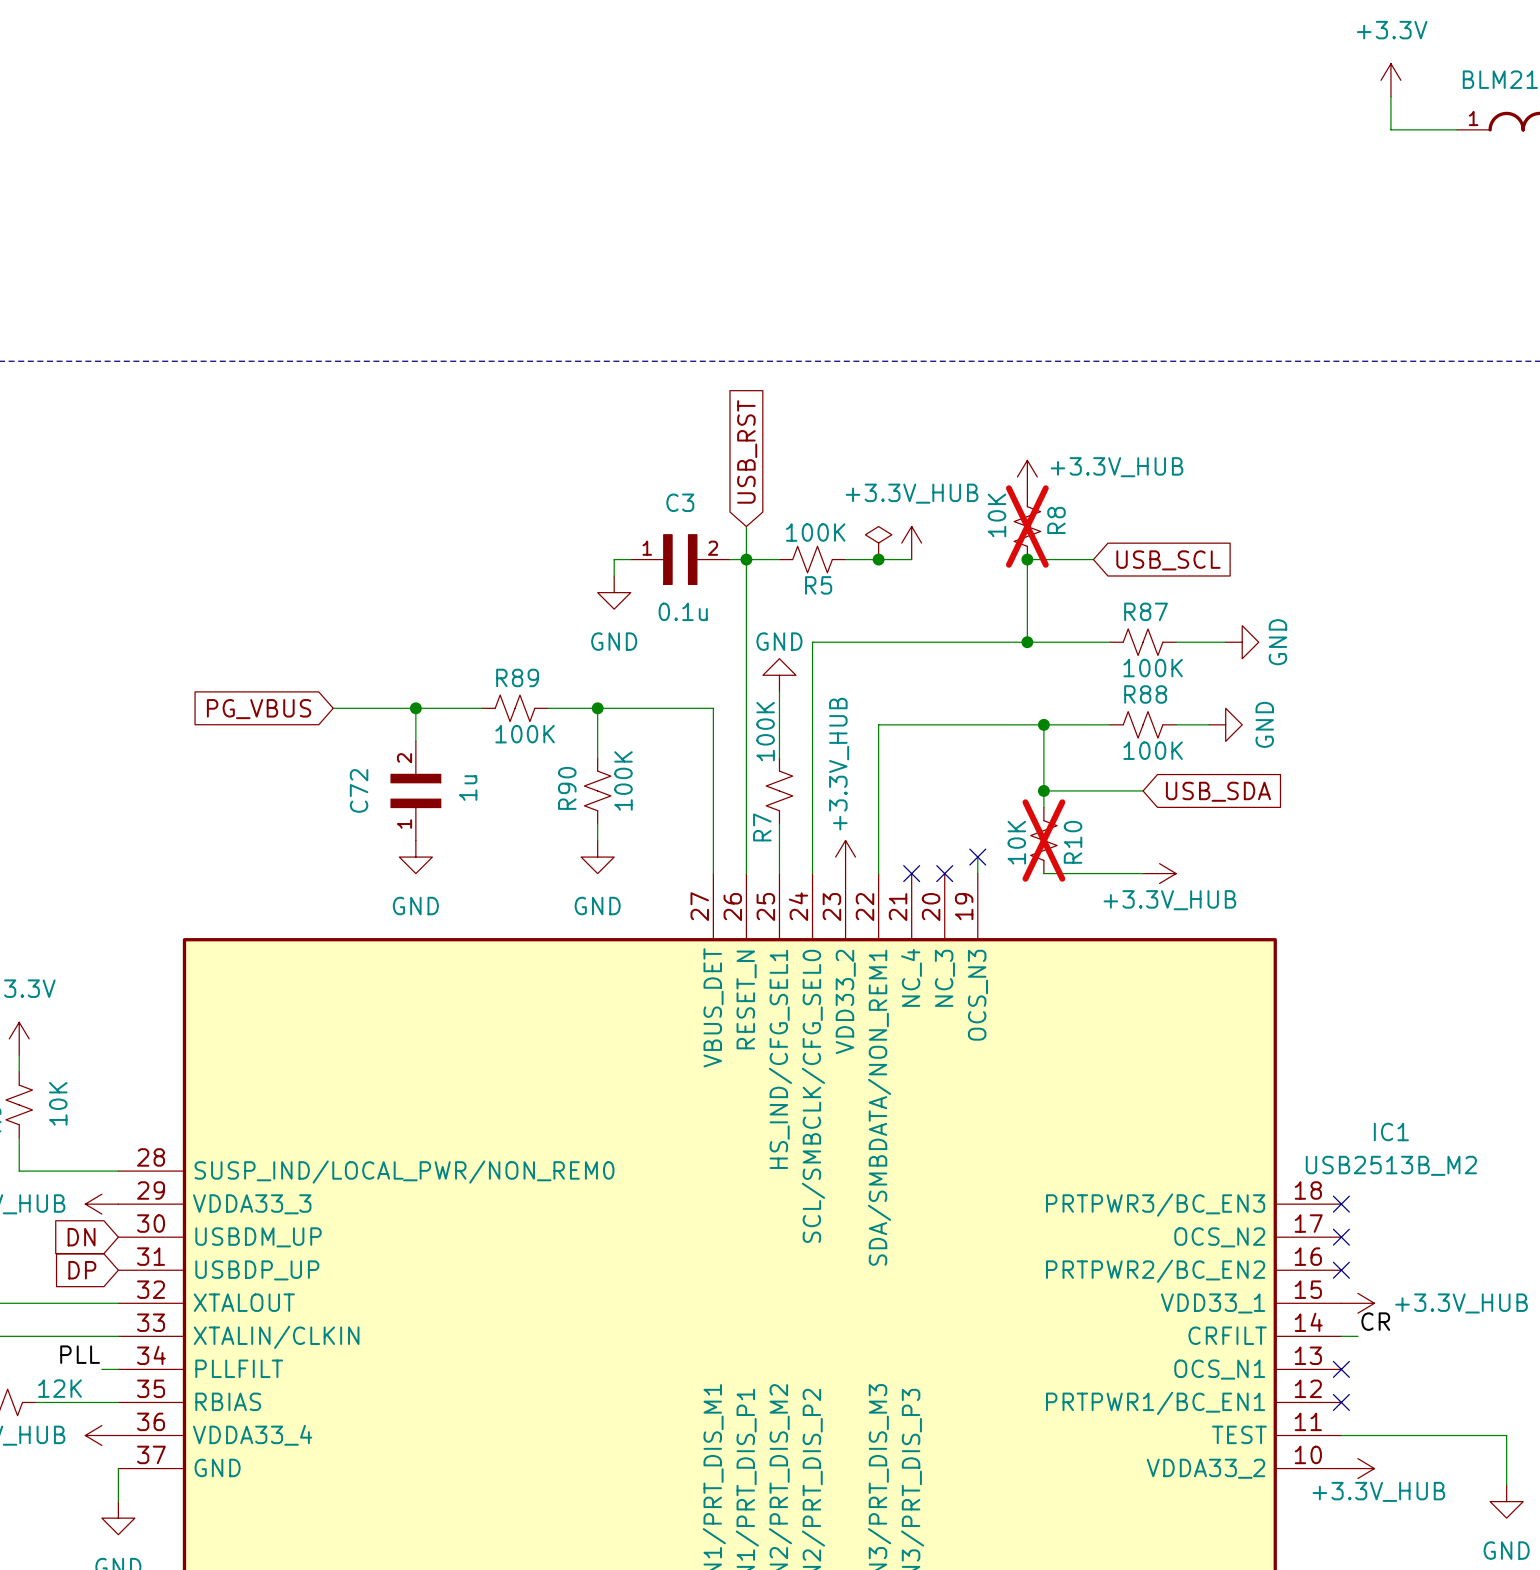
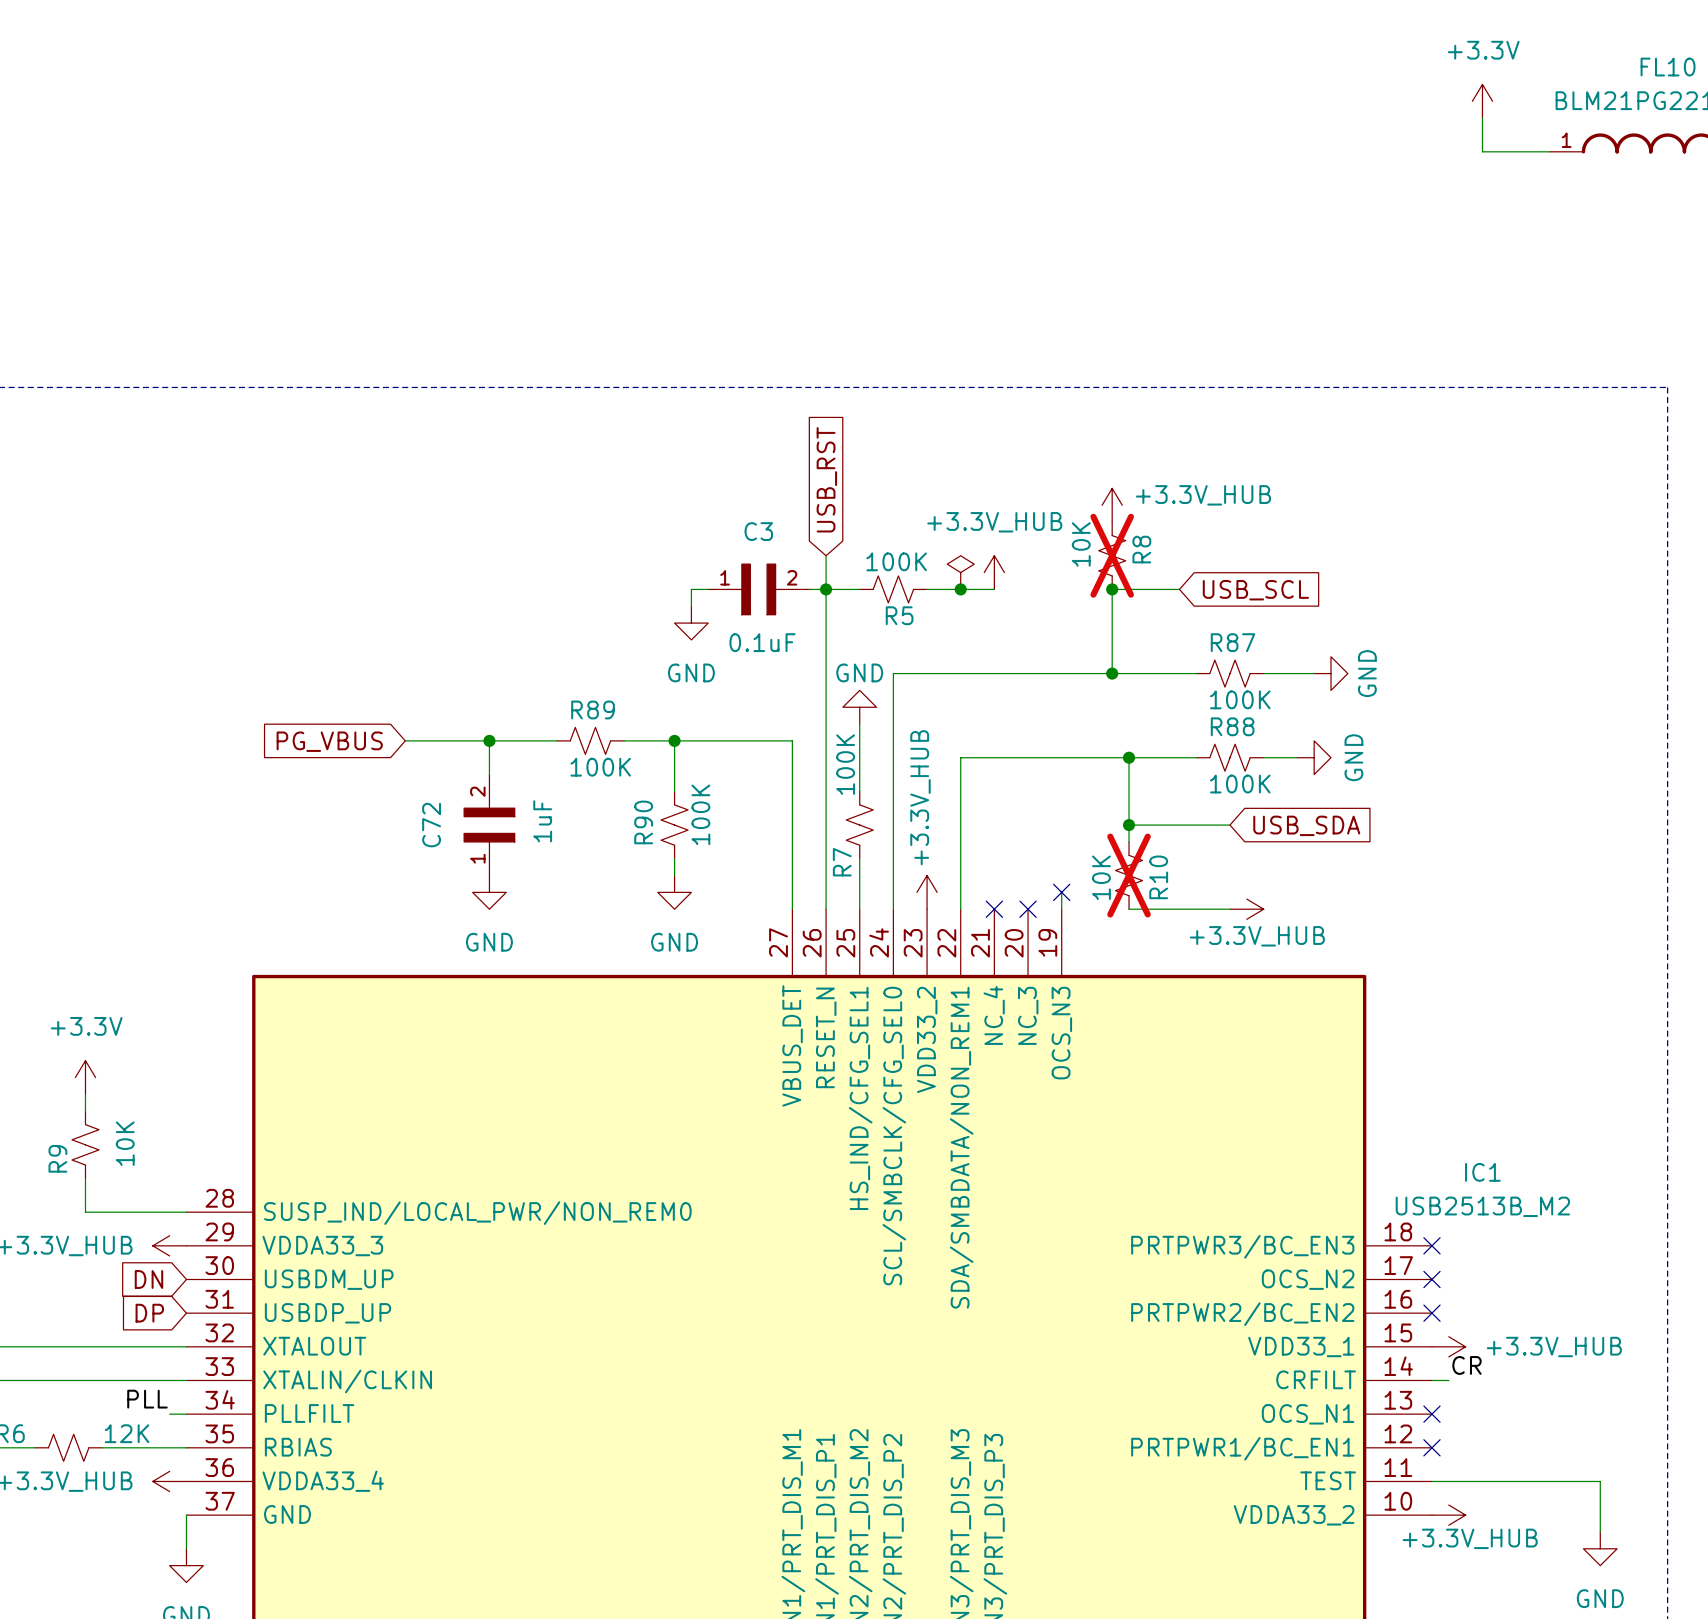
C3 value: 0.1u (683, 611) -> 0.1uF (762, 642)
C72 value: 1u (468, 788) -> 1uF (542, 821)

